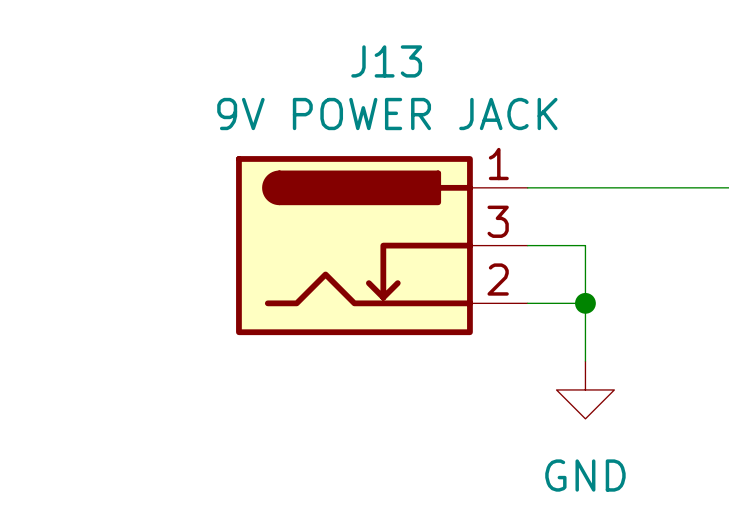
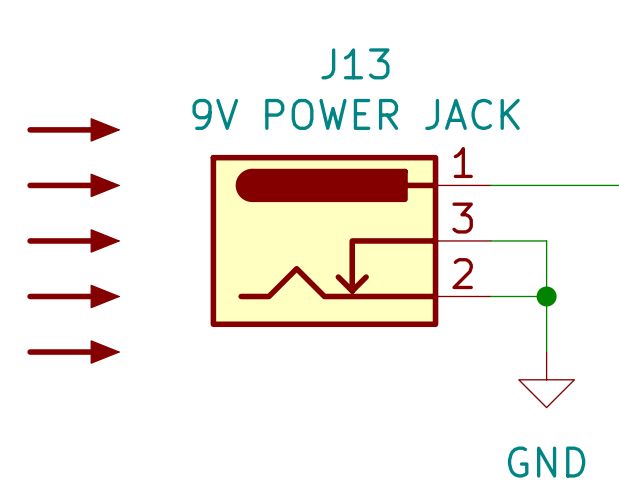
part: none -> (73, 129)
part: none -> (73, 185)
part: none -> (73, 240)
part: none -> (73, 296)
part: none -> (73, 352)

